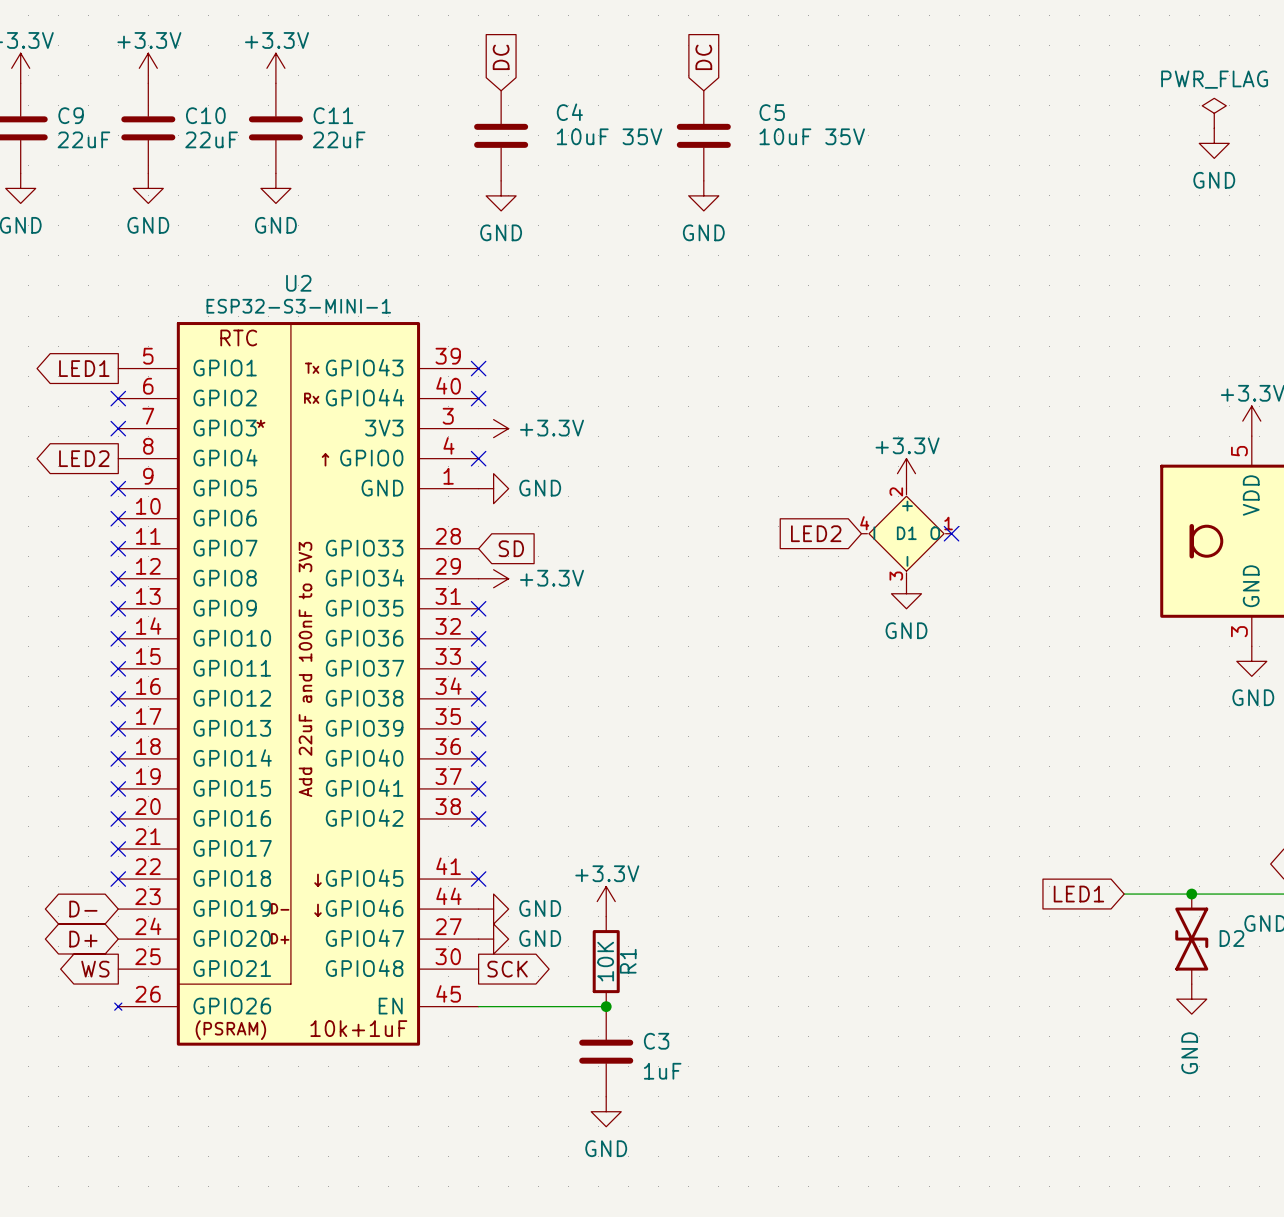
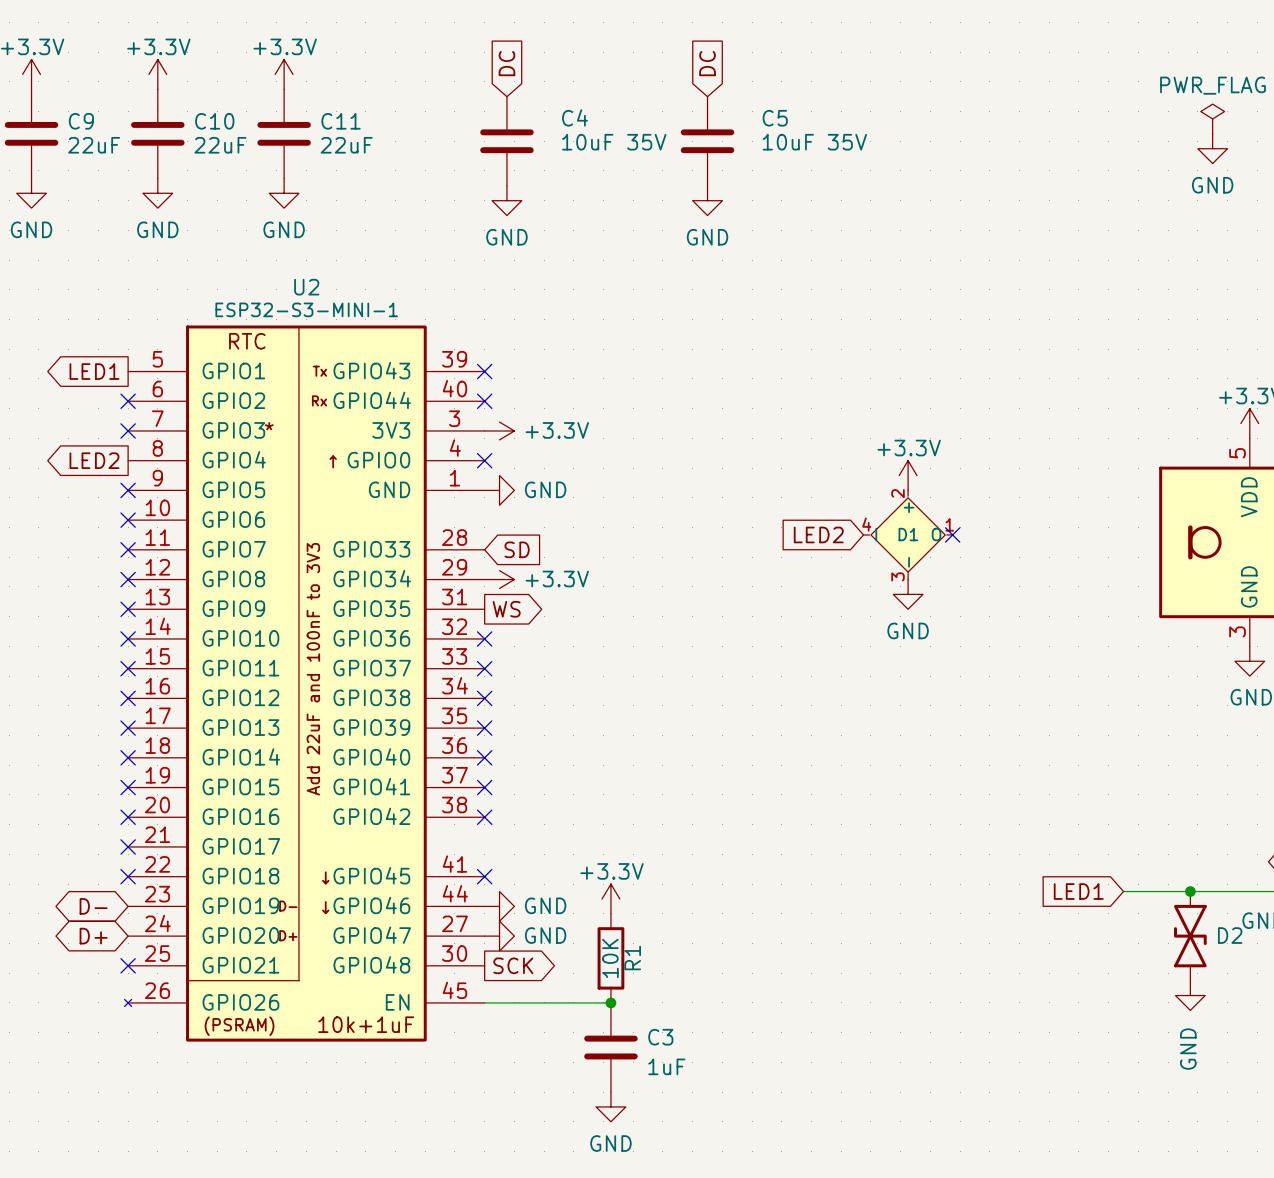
no-connect mark: (478, 608) -> none
global label: none -> WS (506, 609)
global label: WS (95, 969) -> none
no-connect mark: none -> (128, 965)

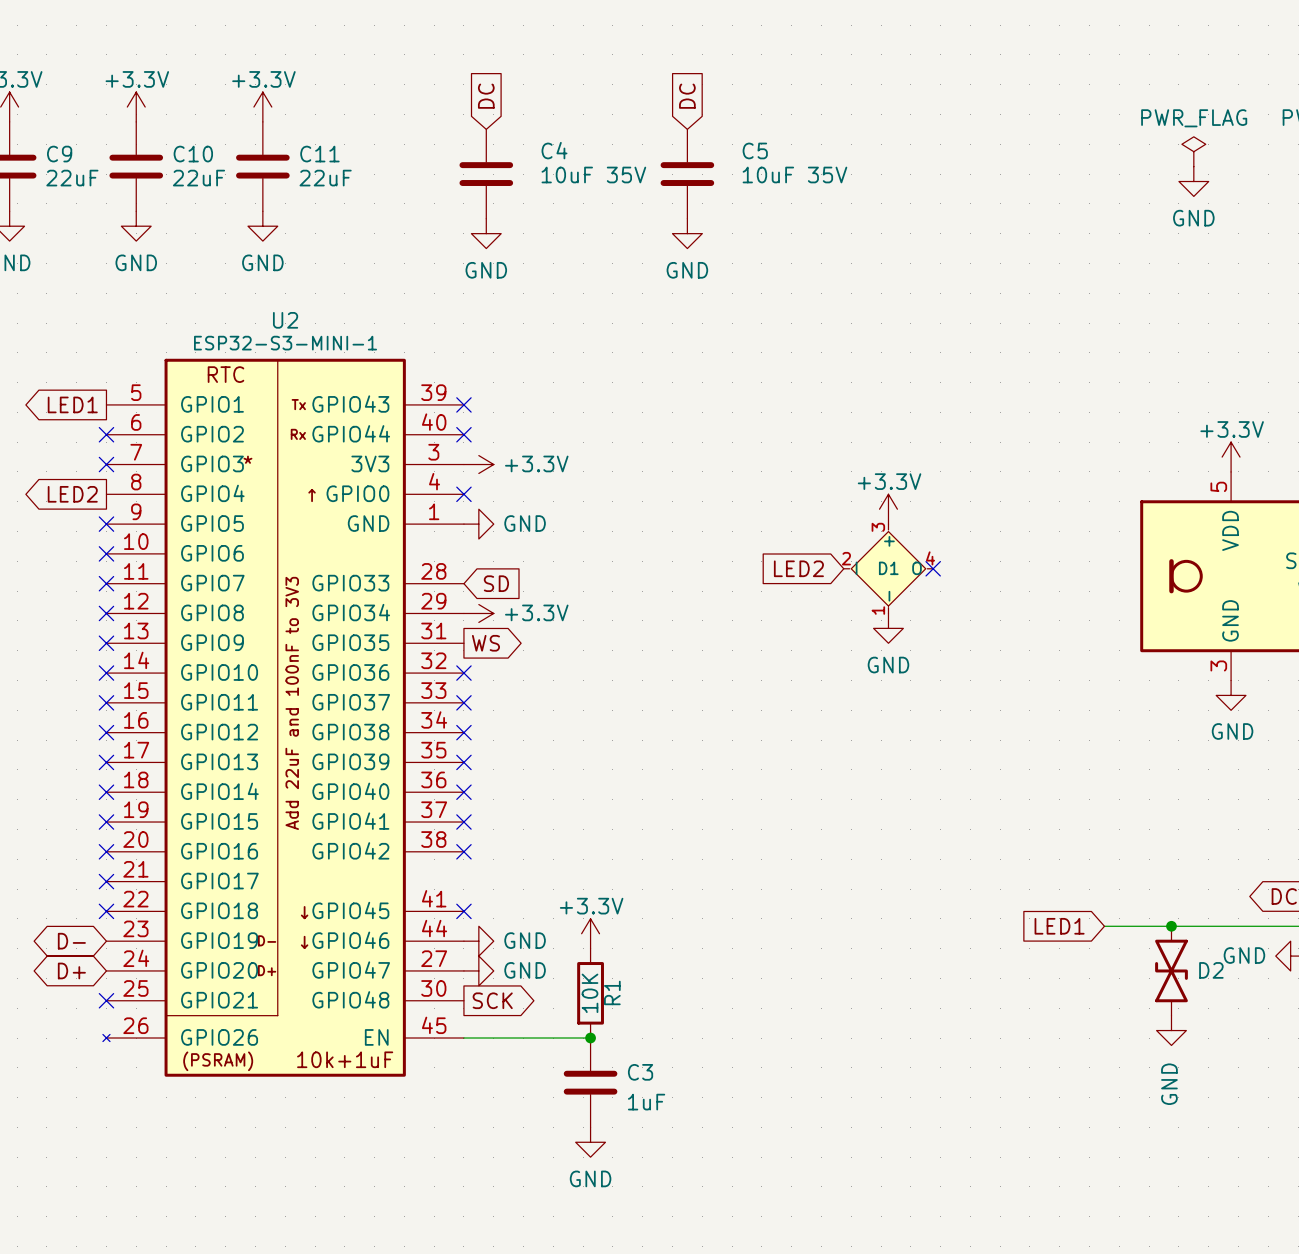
D1 pin number: 2 (898, 493) -> 3 (878, 527)
D1 pin number: 4 (866, 524) -> 2 (846, 558)
D1 pin number: 1 (949, 524) -> 4 (930, 558)
D1 pin number: 3 (898, 576) -> 1 (878, 610)

